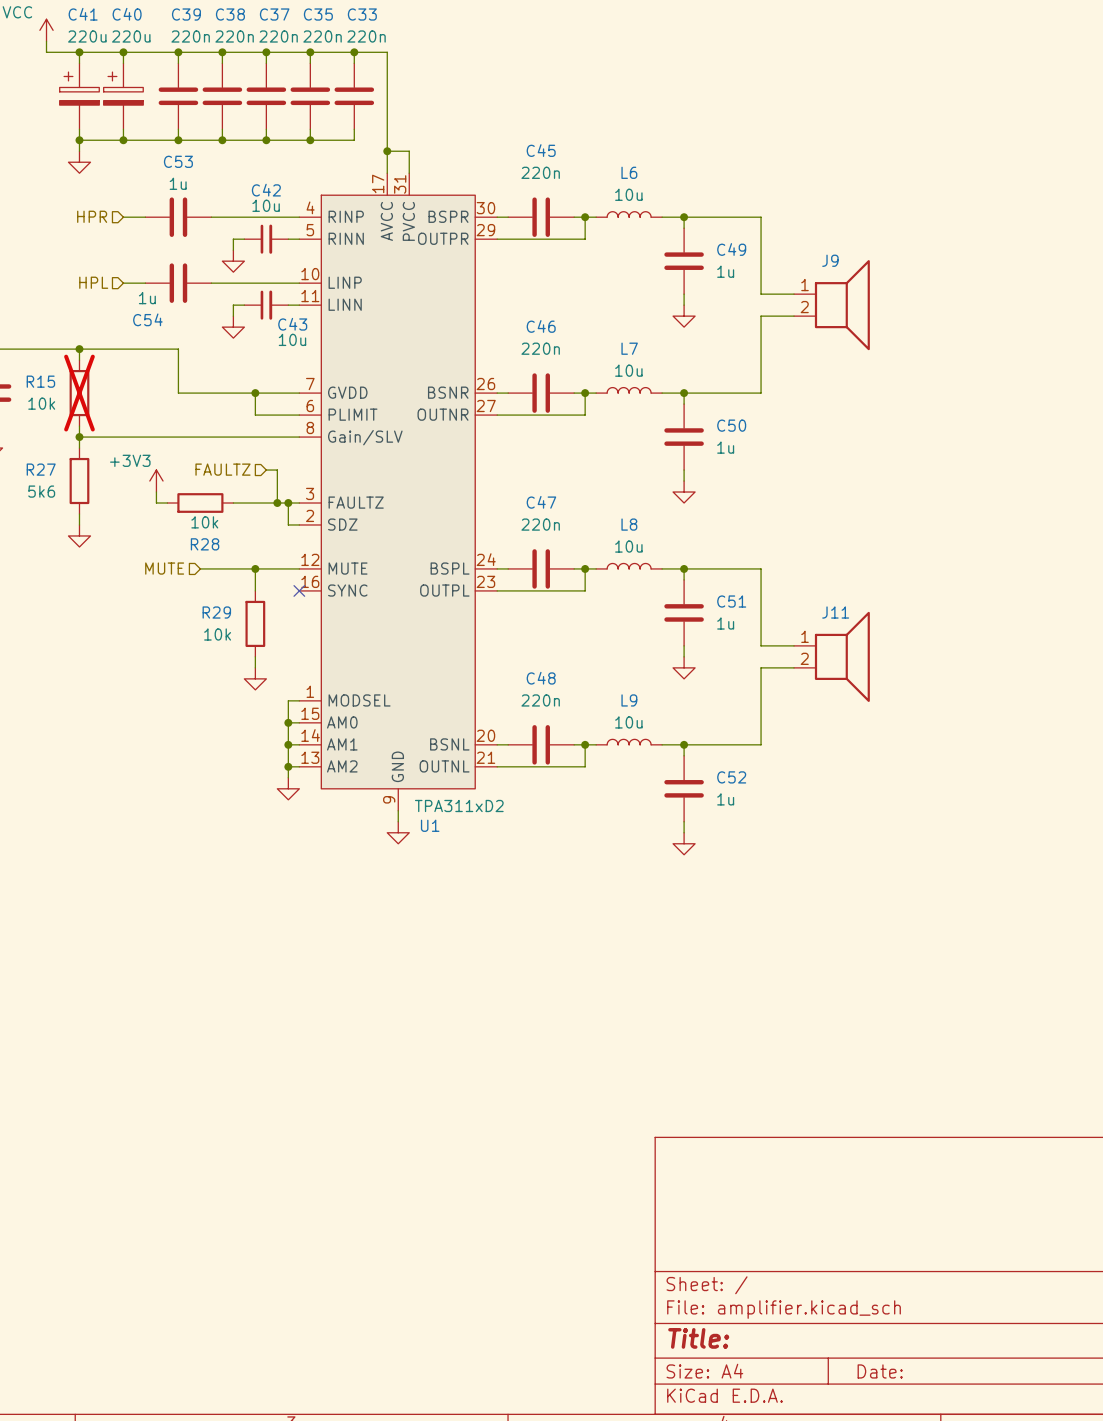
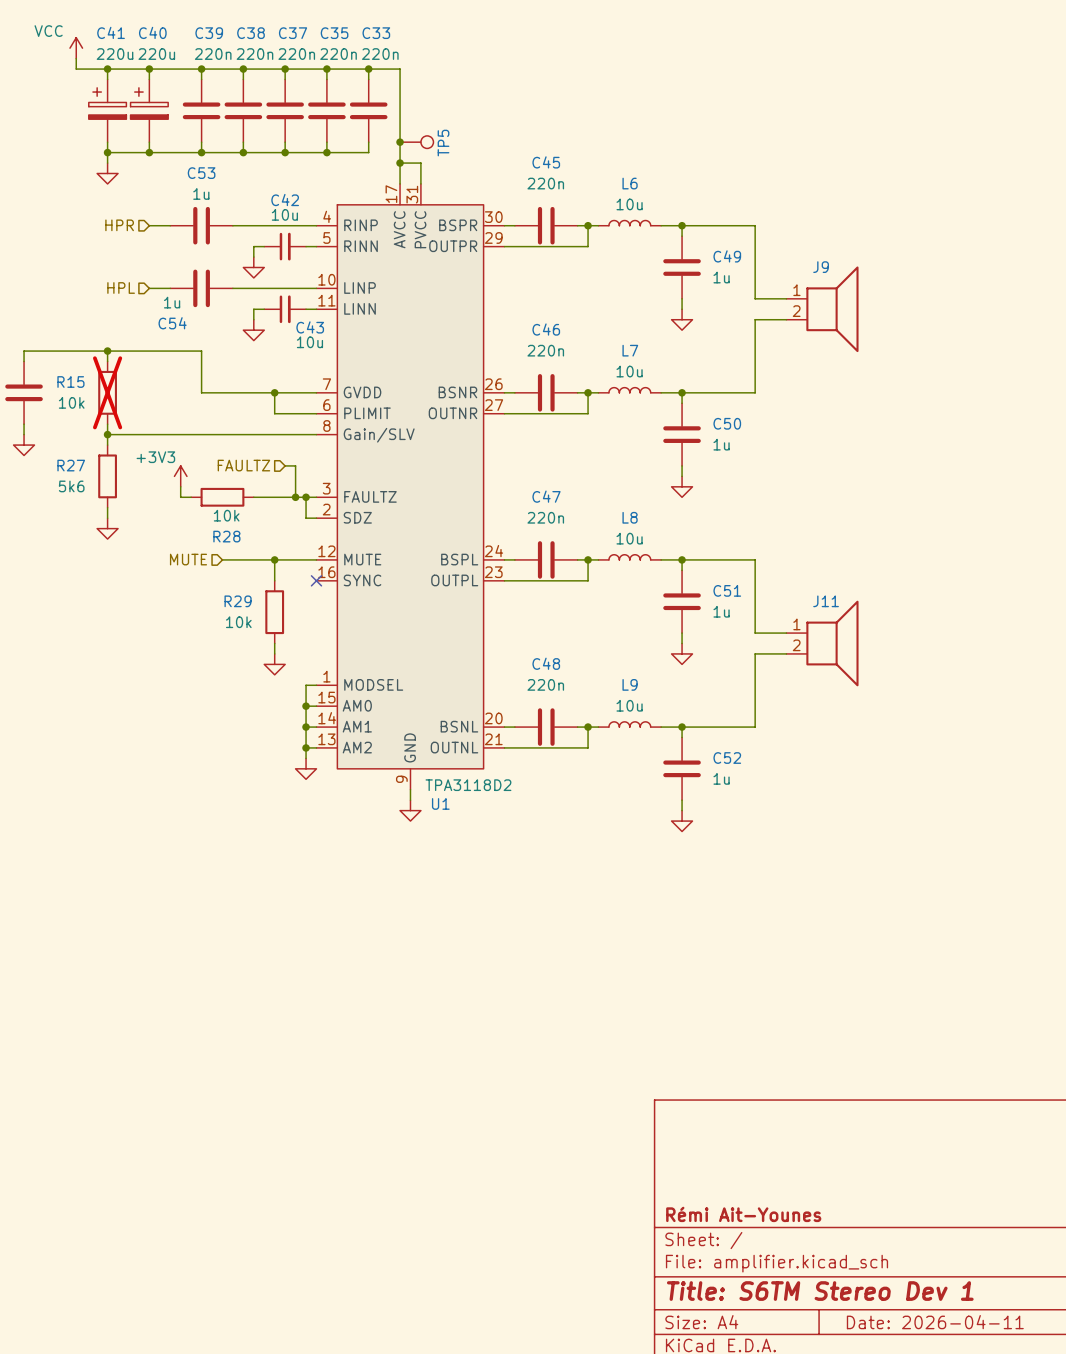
junction: none -> (400, 142)
TP5: none -> (416, 142)
U1 value: TPA311xD2 (459, 805) -> TPA3118D2 (468, 785)
title block: none -> Rémi Ait-Younes (743, 1214)
title block: Title: (698, 1338) -> Title: S6TM Stereo Dev 1 (820, 1291)
title block: Date: (880, 1371) -> Date: 2026-04-11 (935, 1322)

